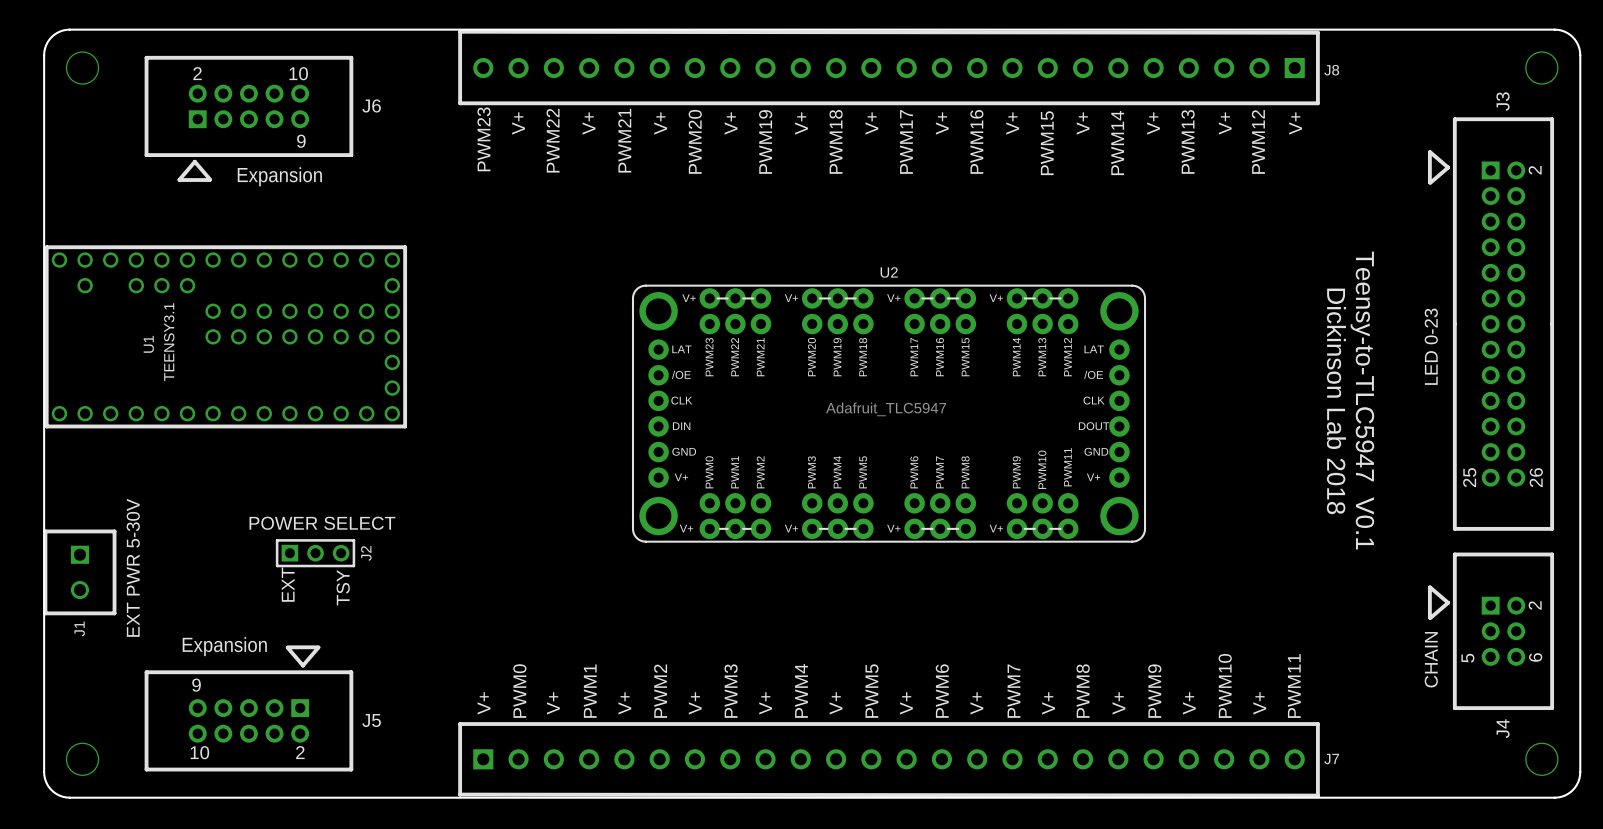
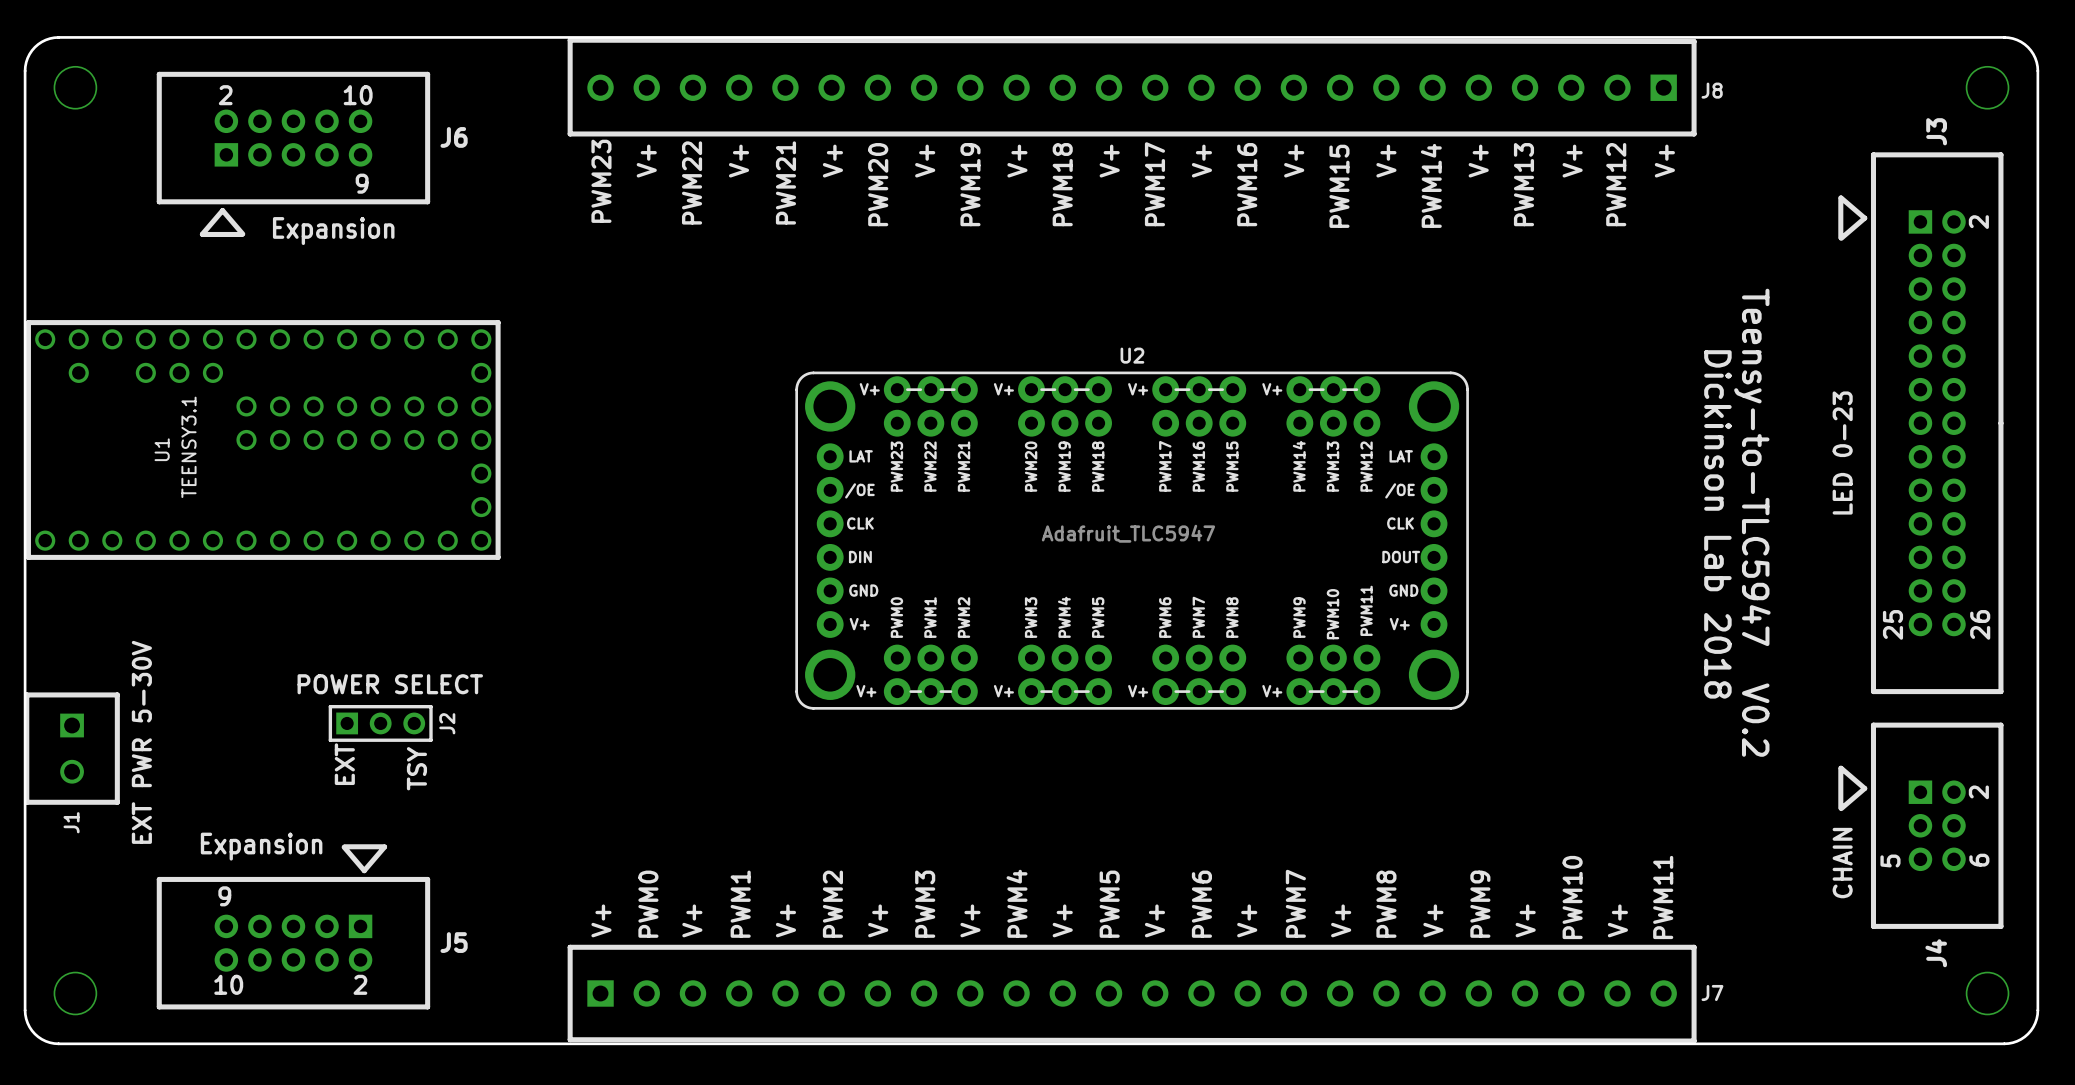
text: Teensy-to-TLC5947 V0.1 (1362, 400) -> Teensy-to-TLC5947 V0.2 (1752, 522)

